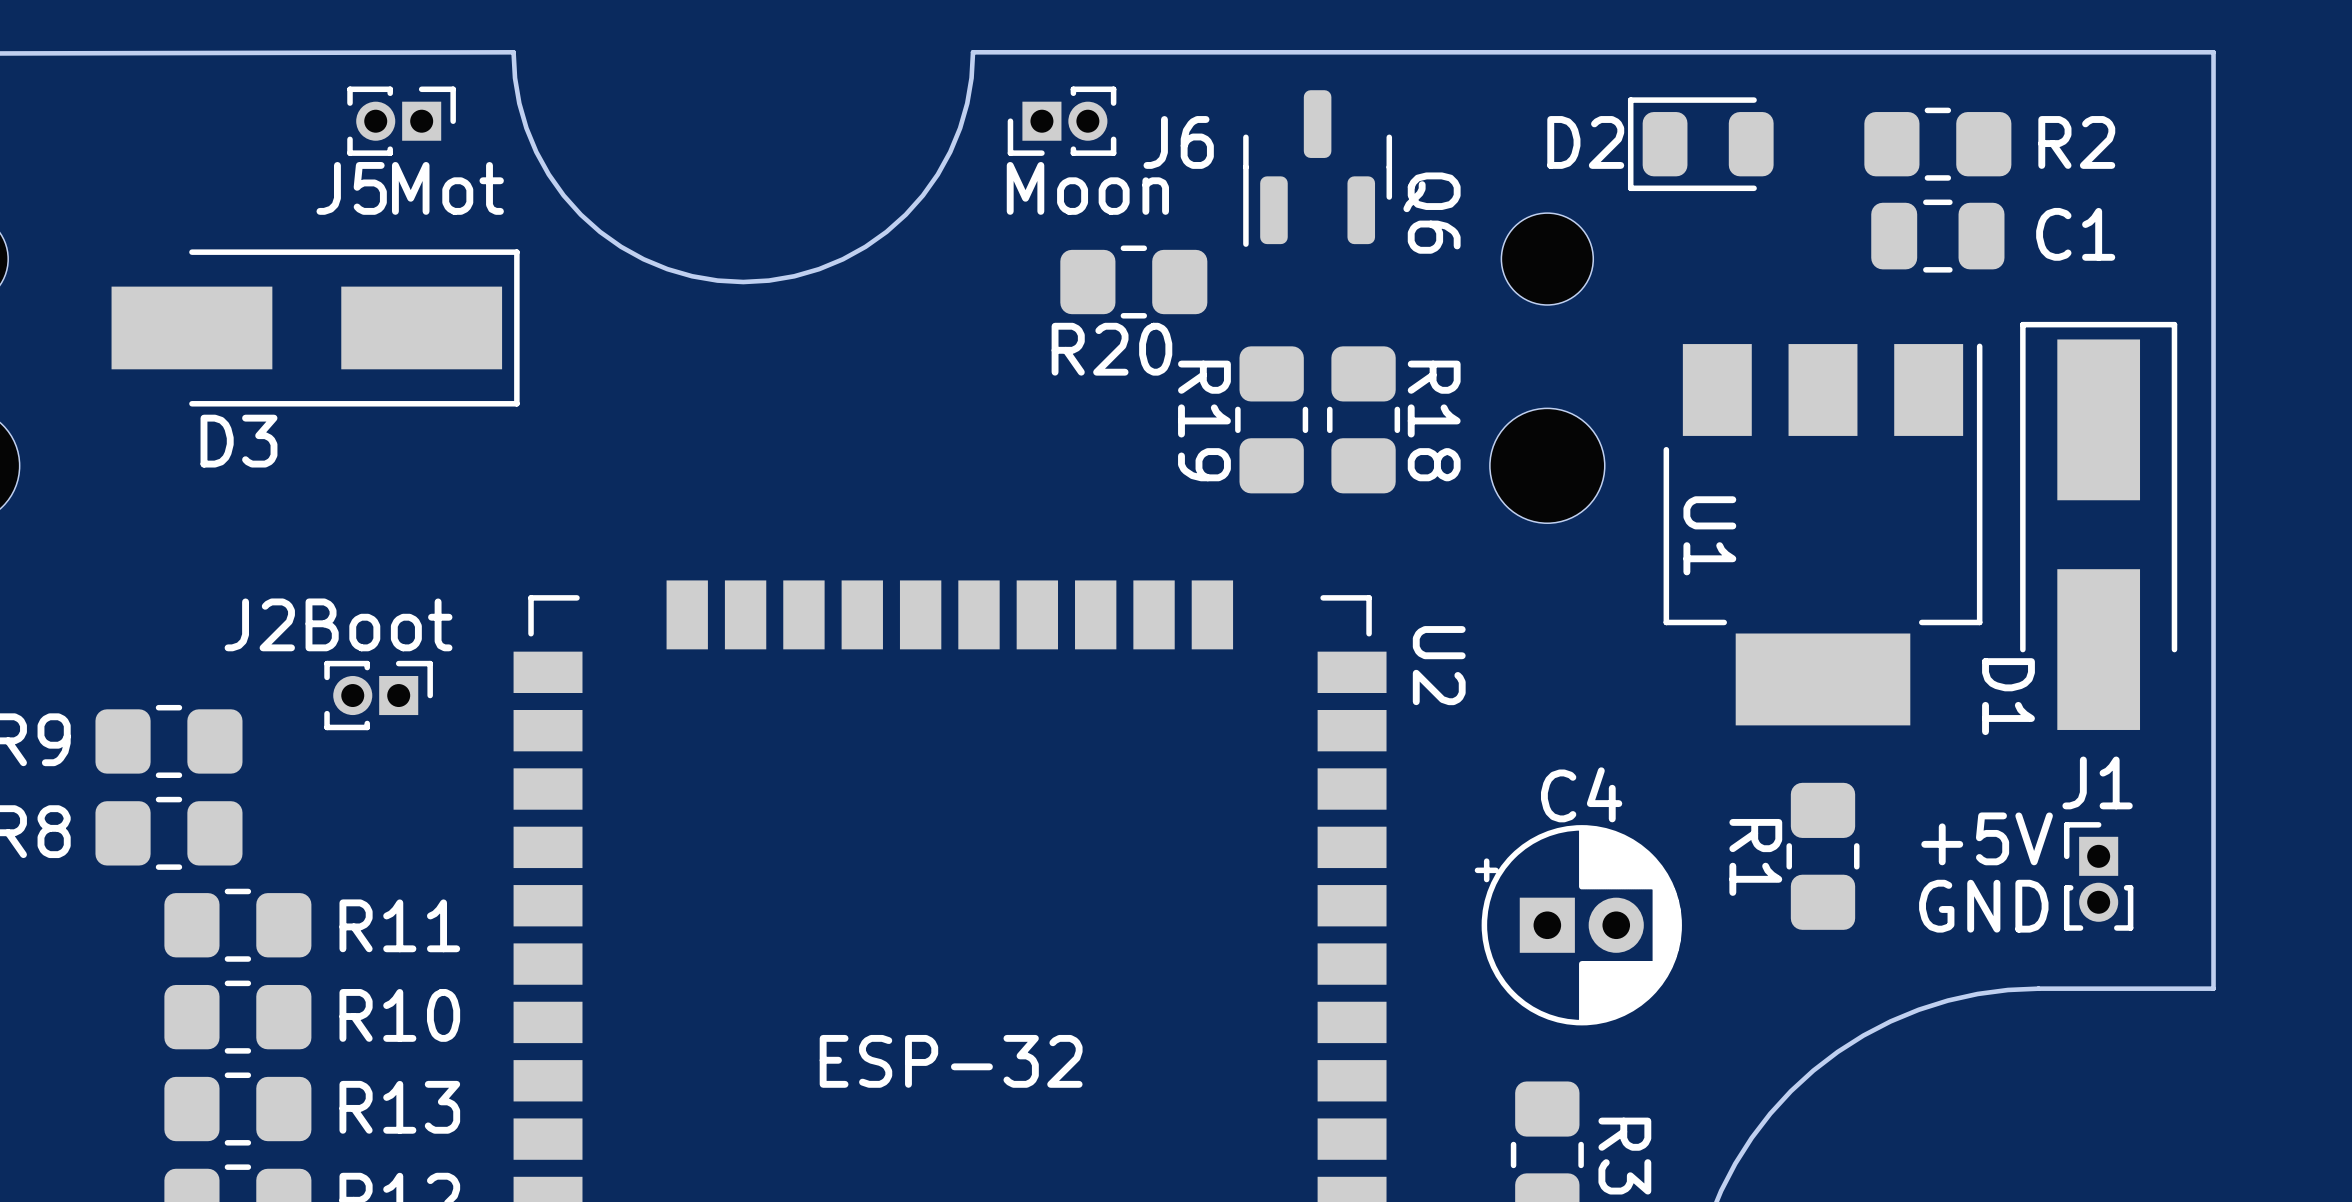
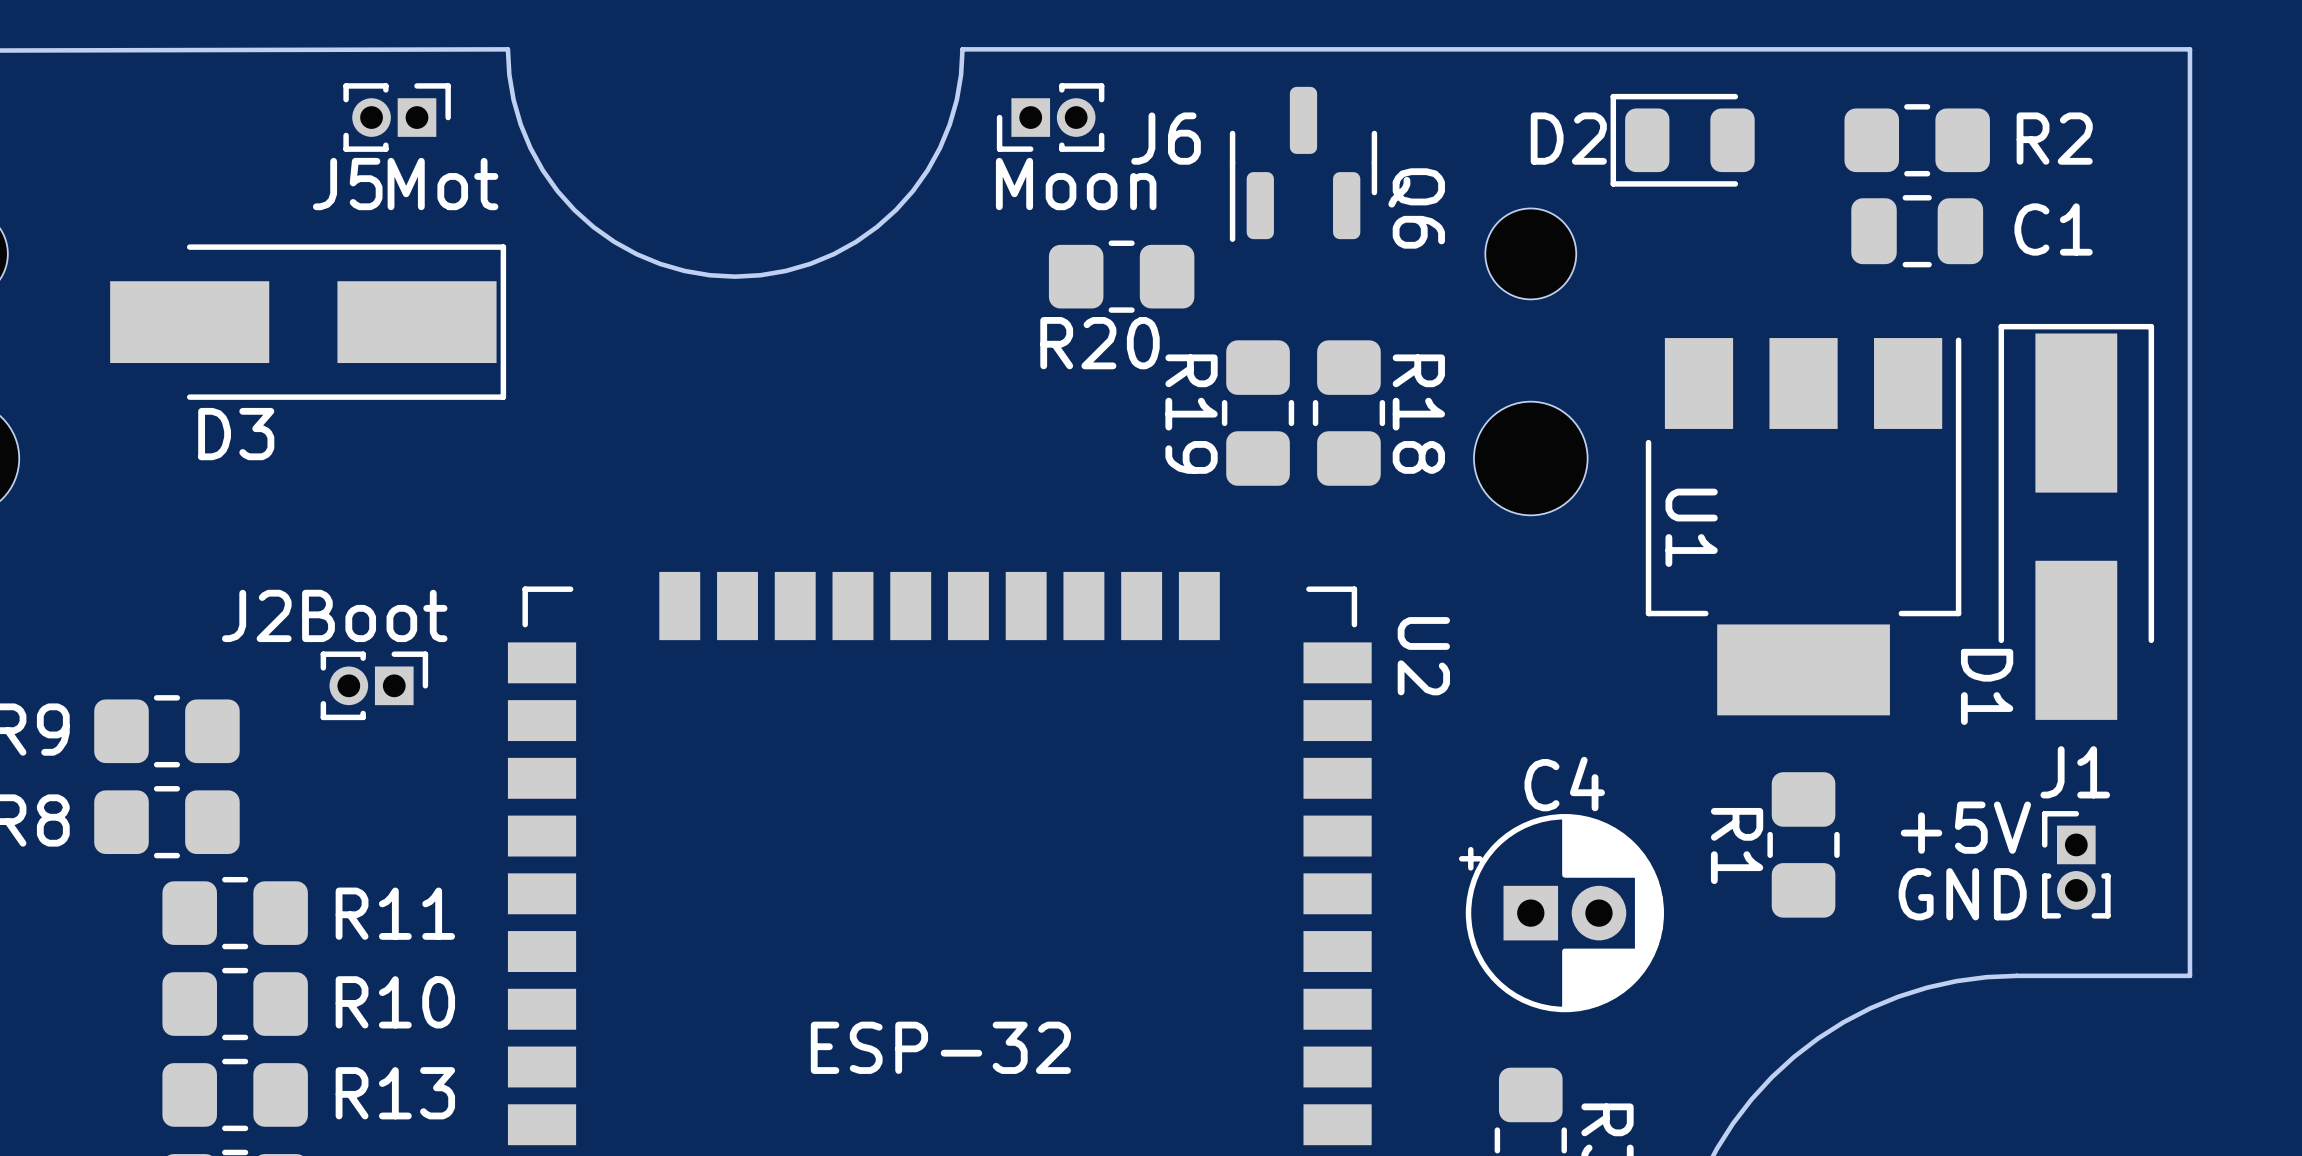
D3 footprint: [111, 249, 520, 407] -> [110, 244, 507, 400]
D1 footprint: [2020, 321, 2178, 730] -> [1998, 323, 2155, 720]

